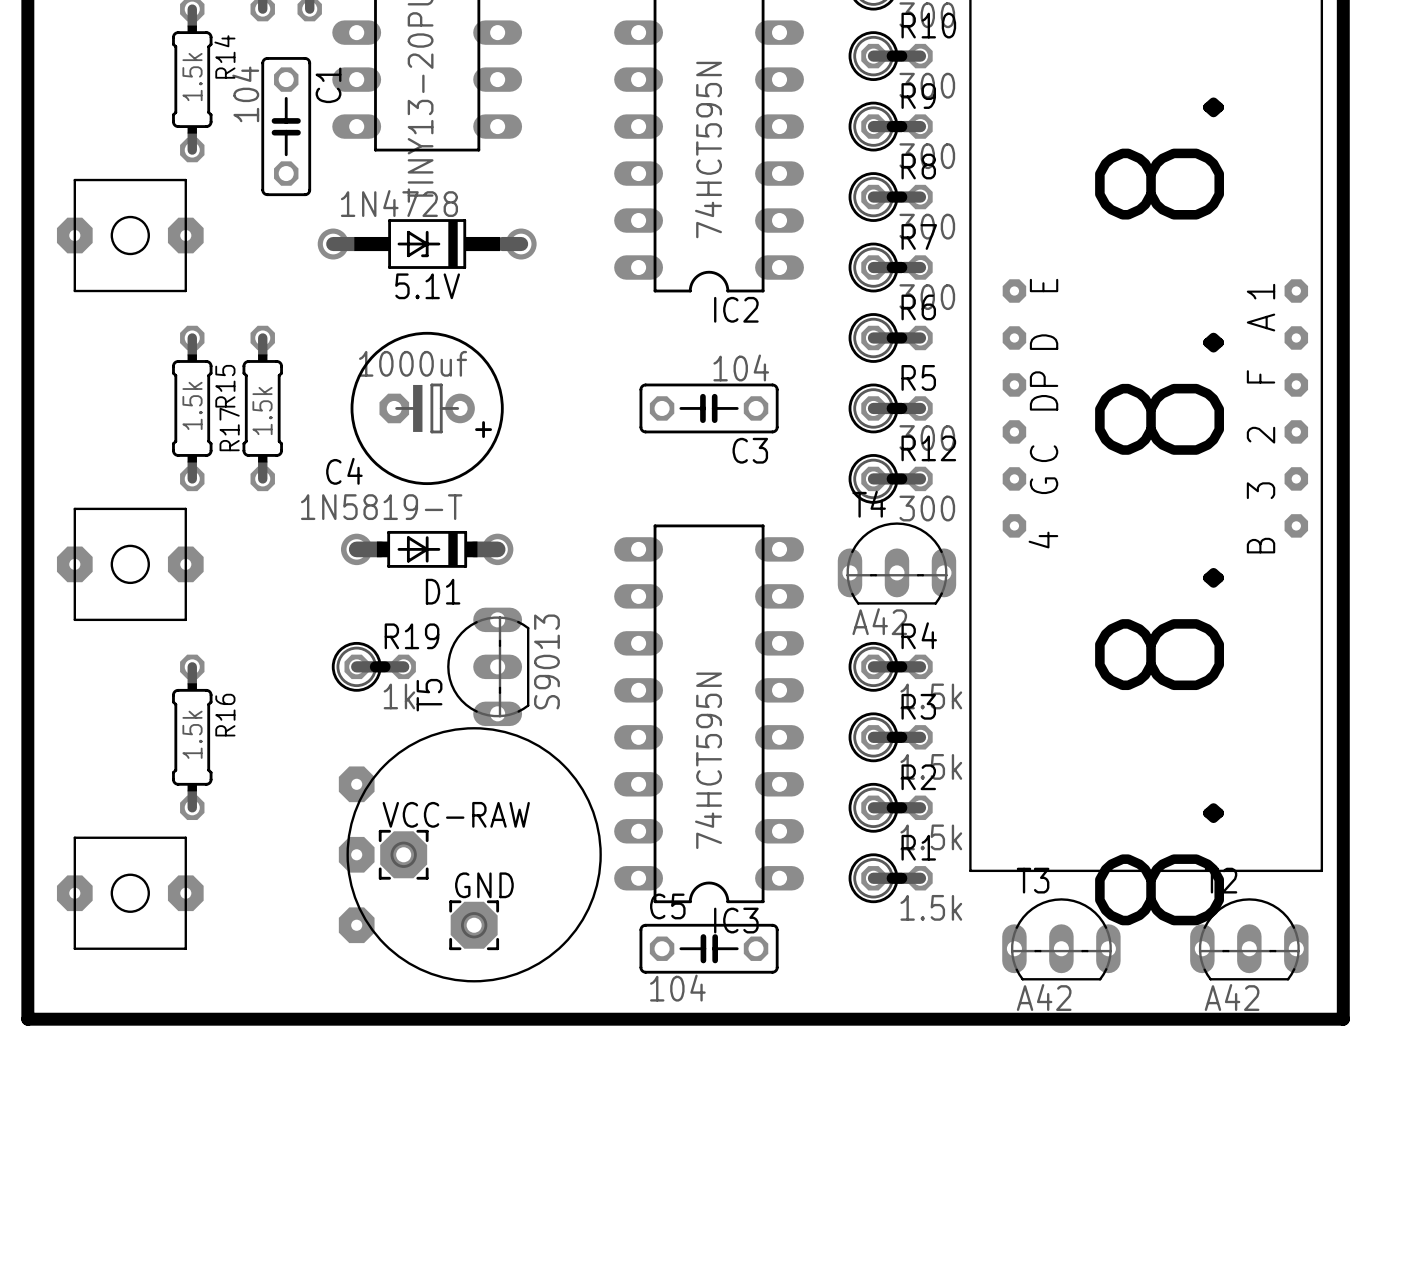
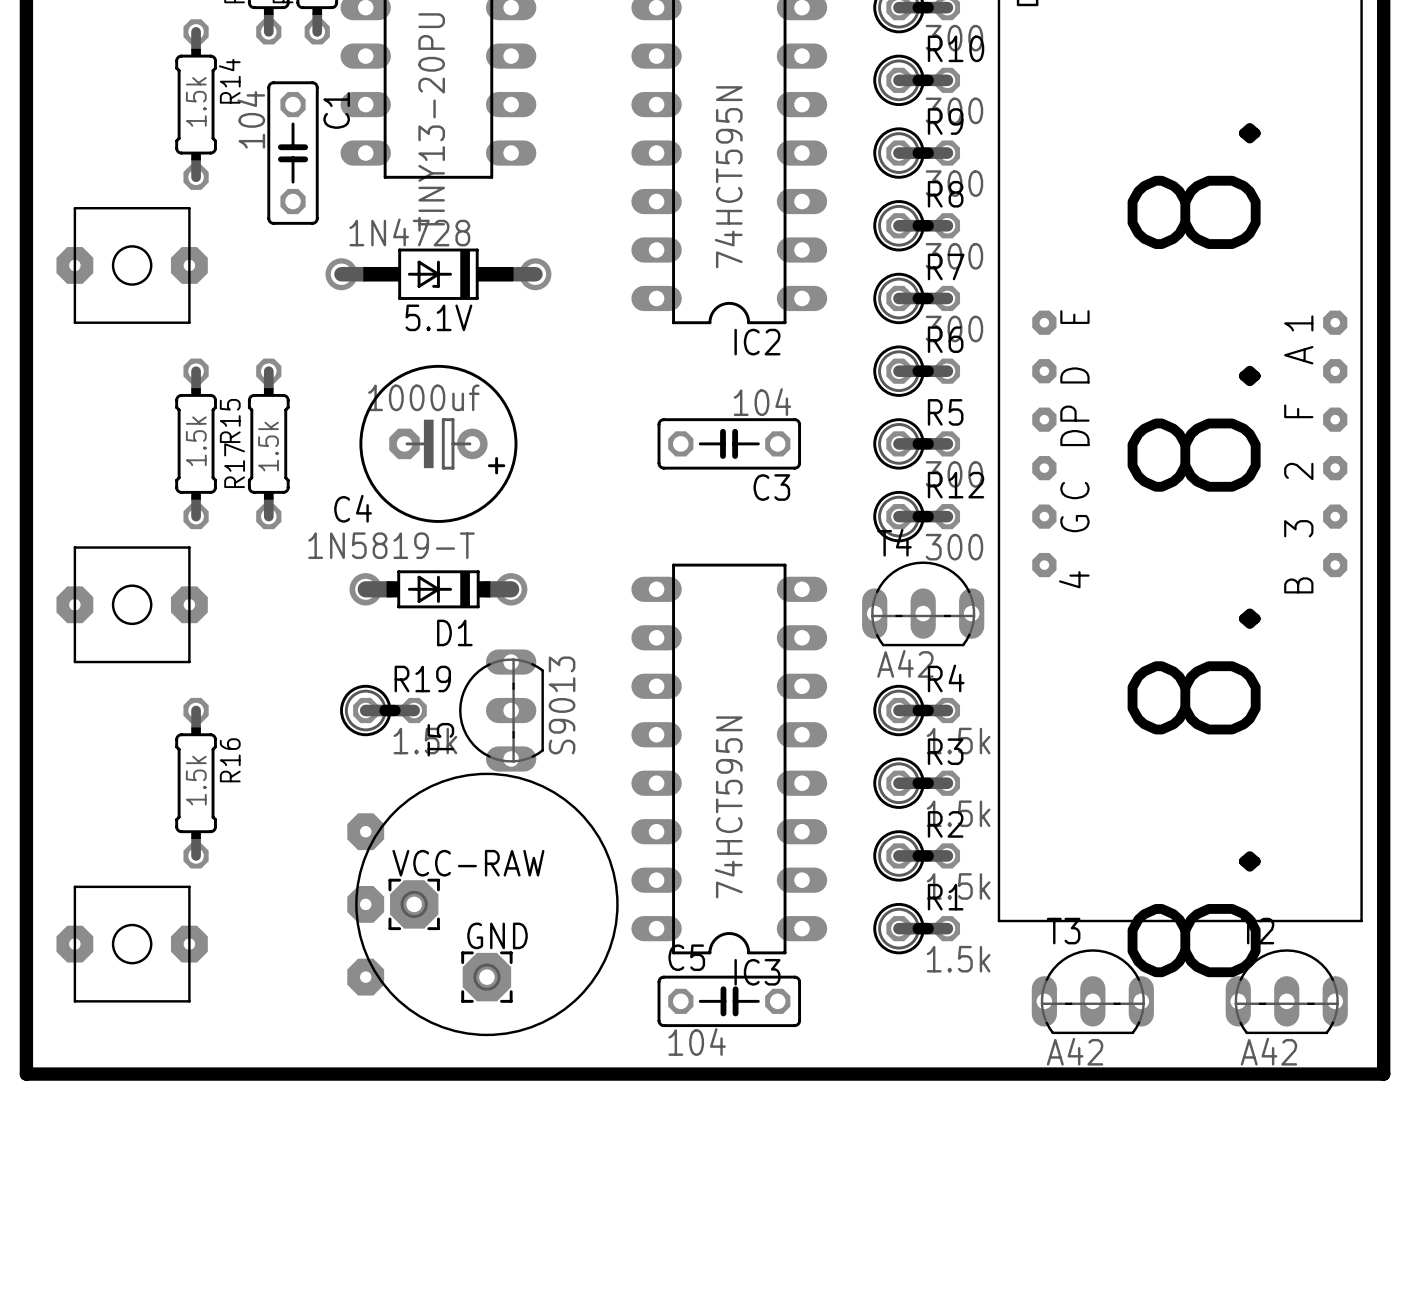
R19 value: 1k (399, 696) -> 1.5k (425, 741)

